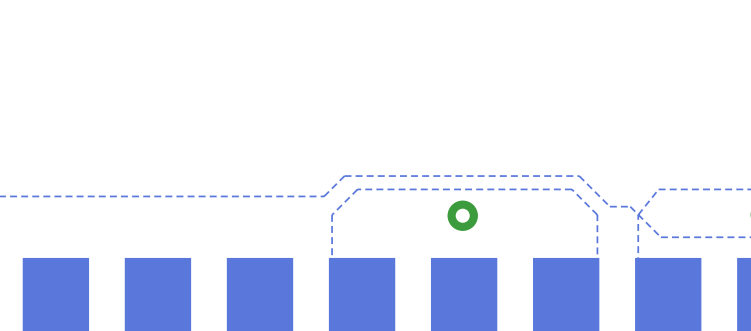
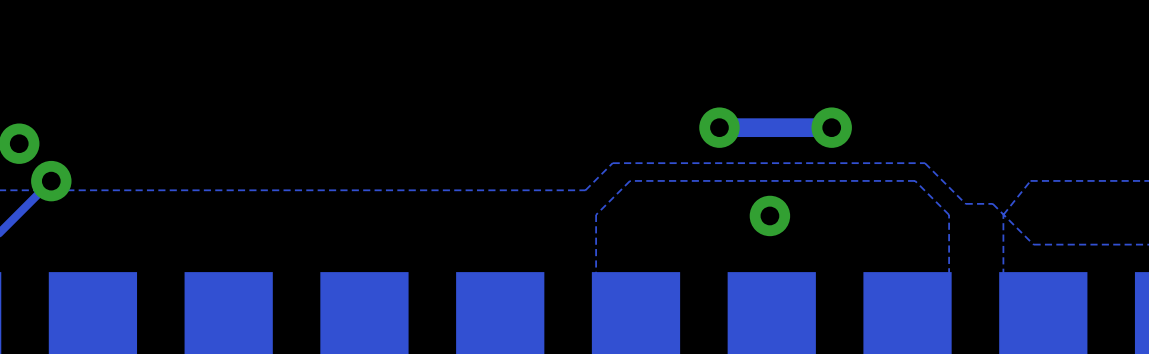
via: none -> (719, 127)
track: none -> (831, 127) (719, 127)
via: none -> (831, 127)

